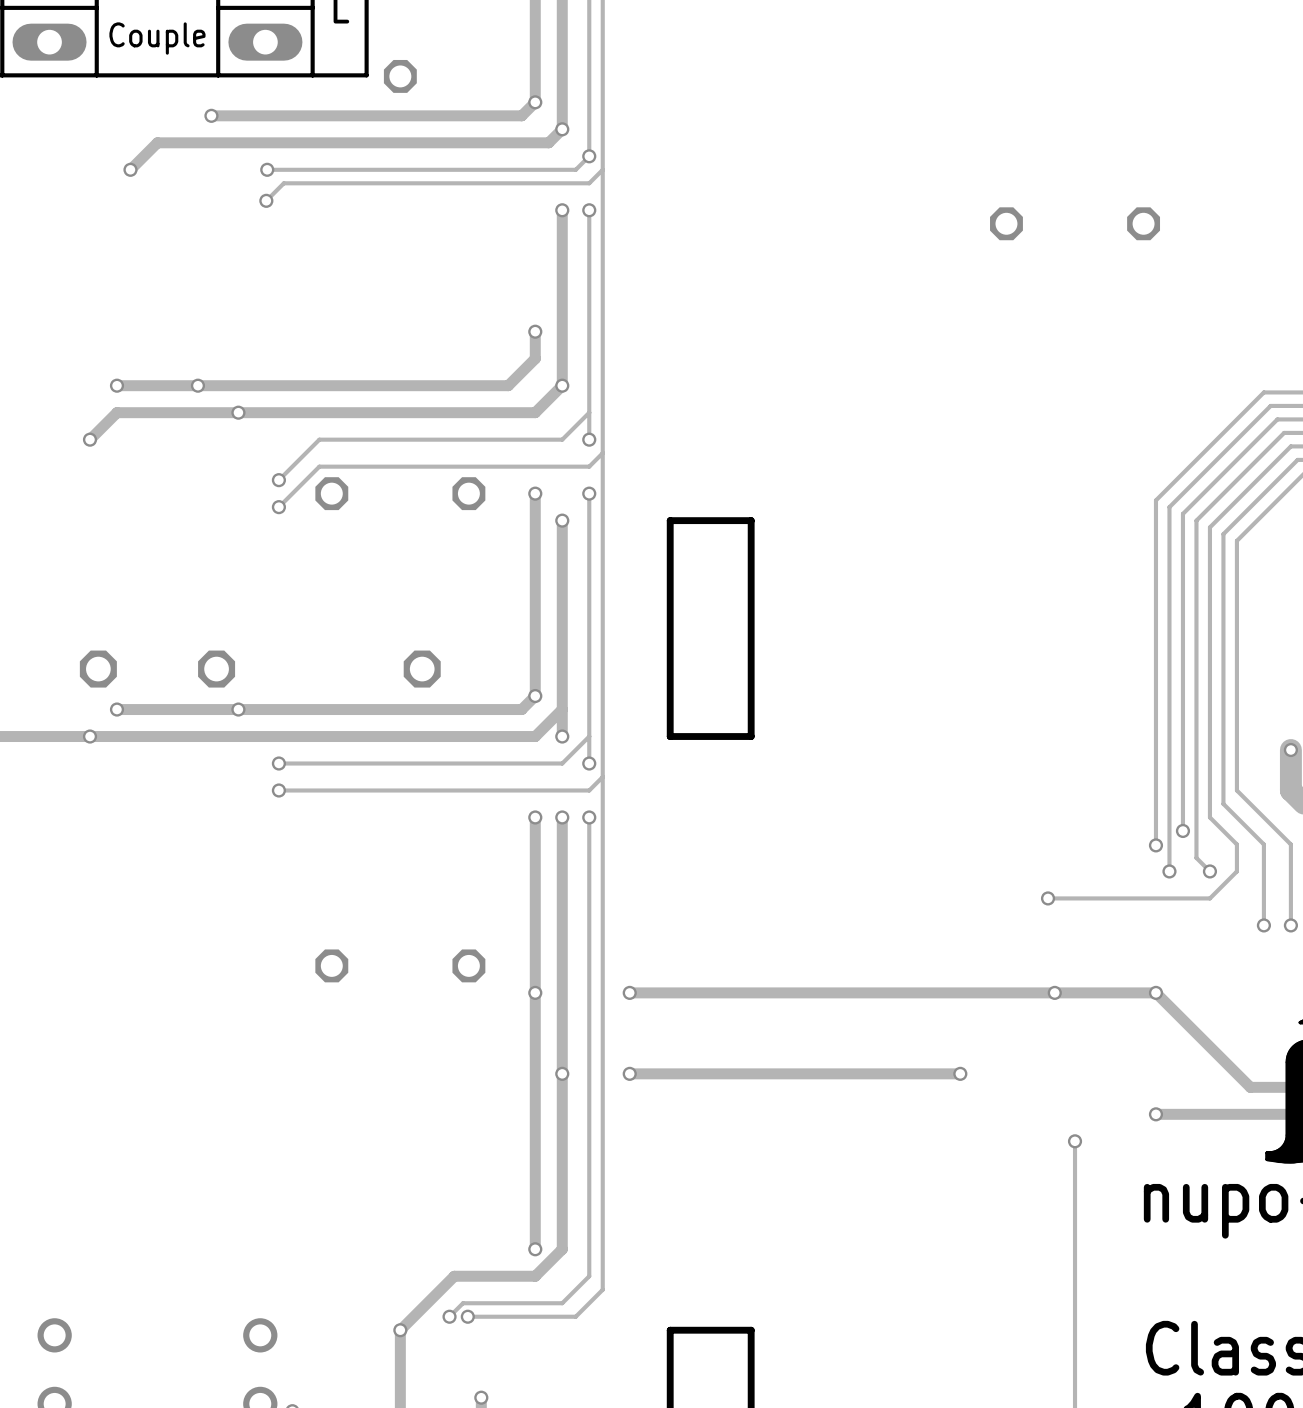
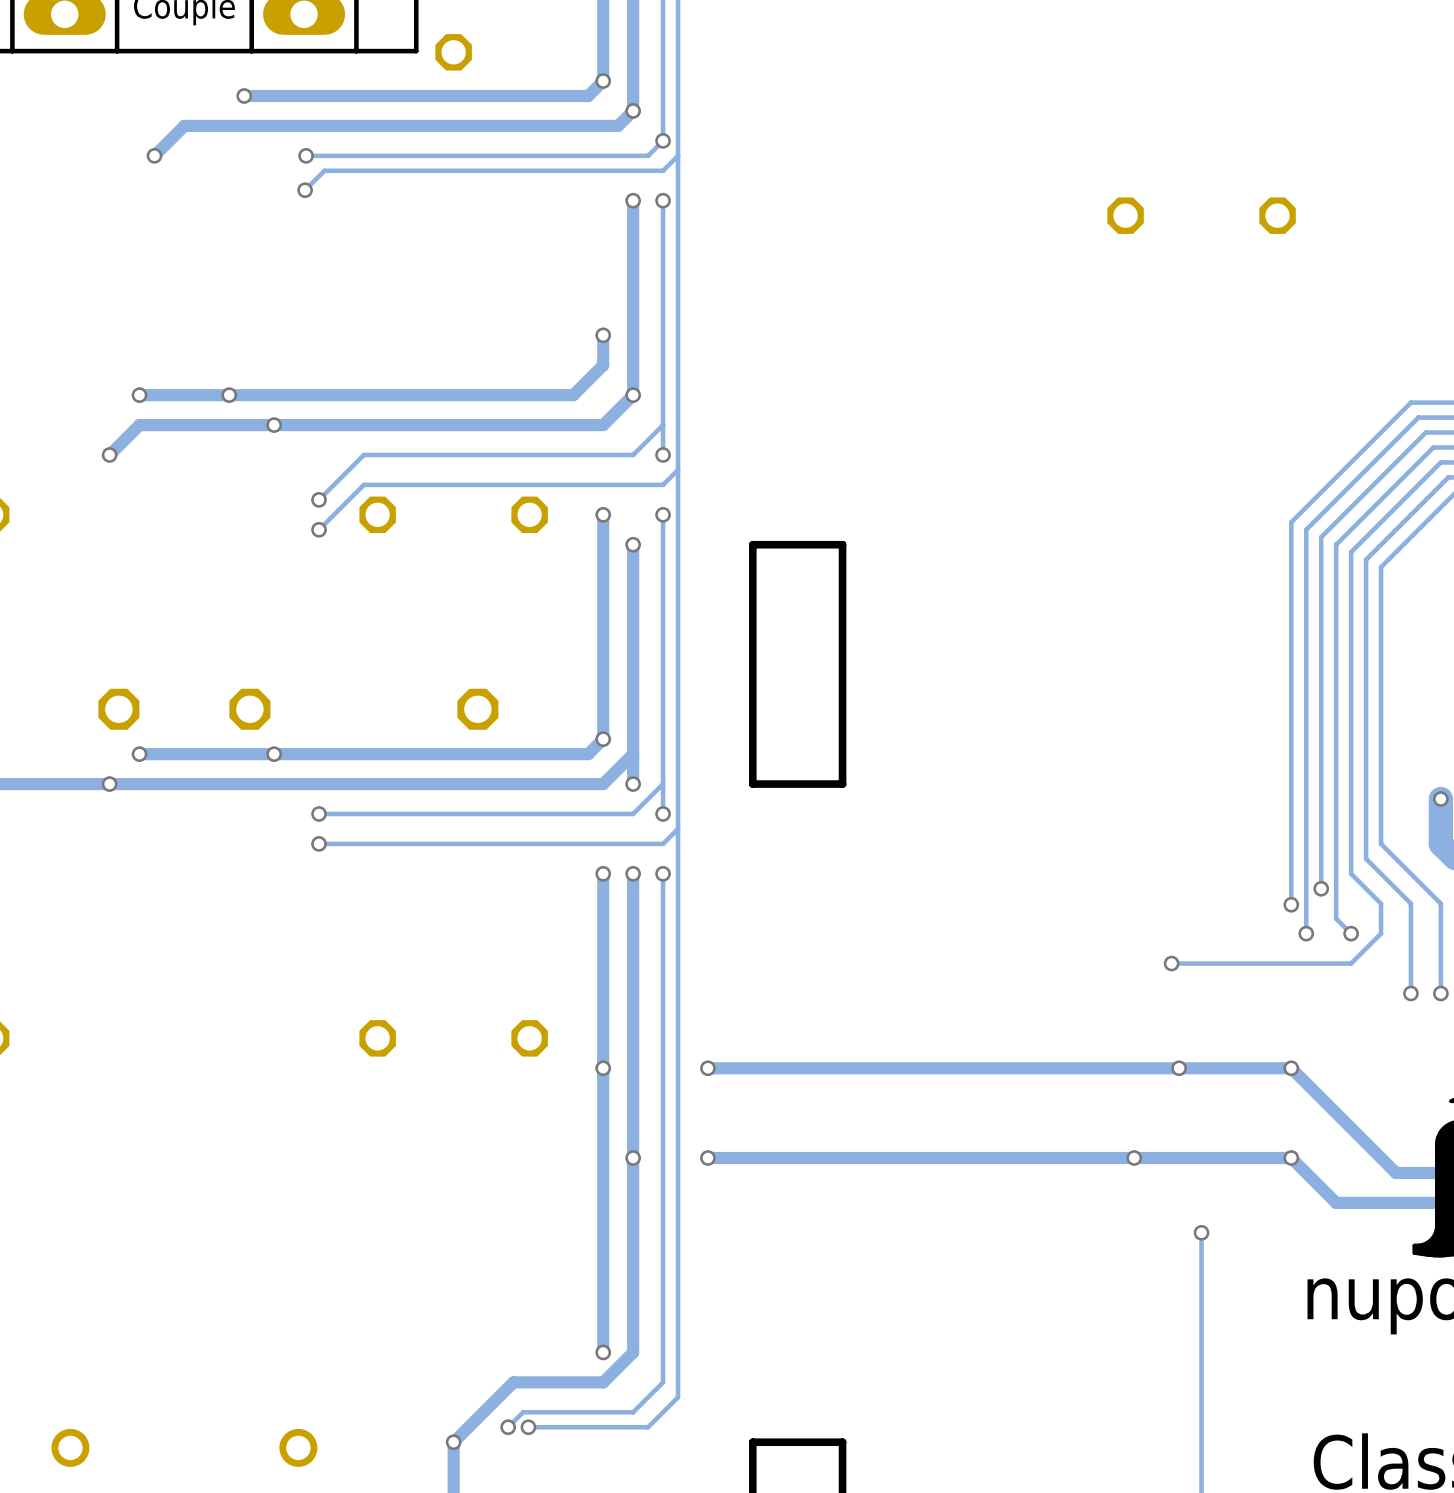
via position: (960, 1073) -> (1134, 1158)
via position: (1155, 1114) -> (1291, 1158)
track: (1196, 1114) (1155, 1114) -> (1336, 1202) (1291, 1158) (1074, 1158)

